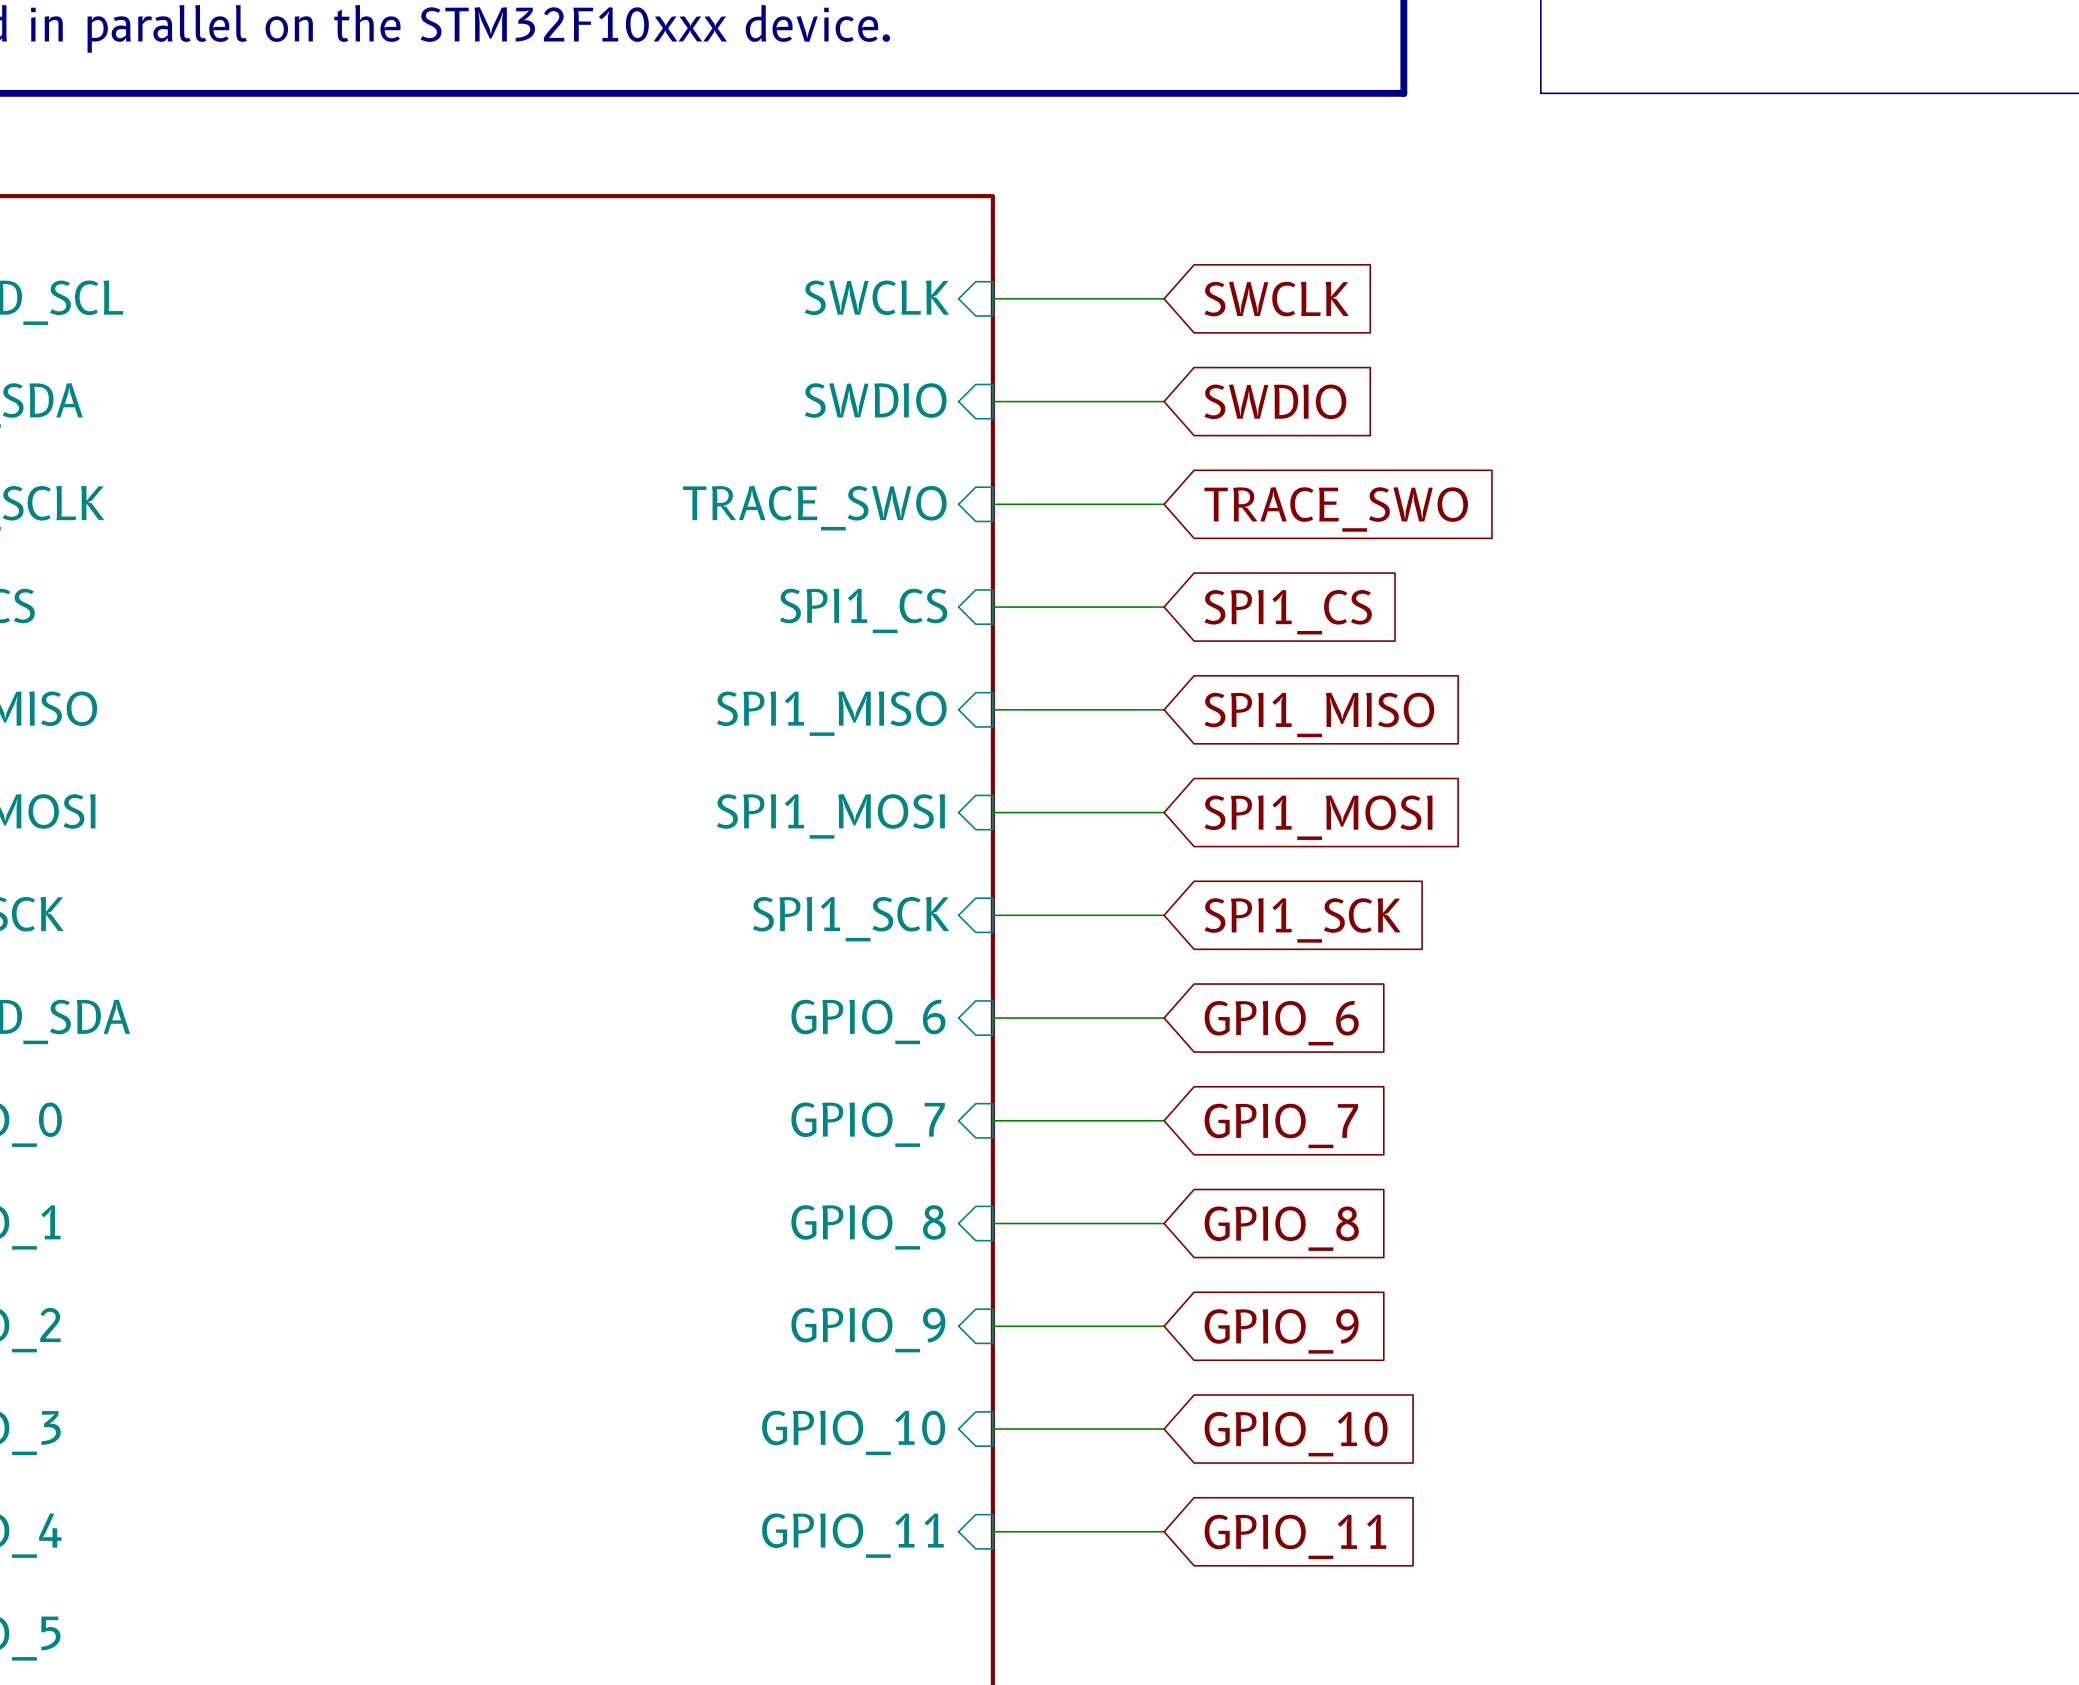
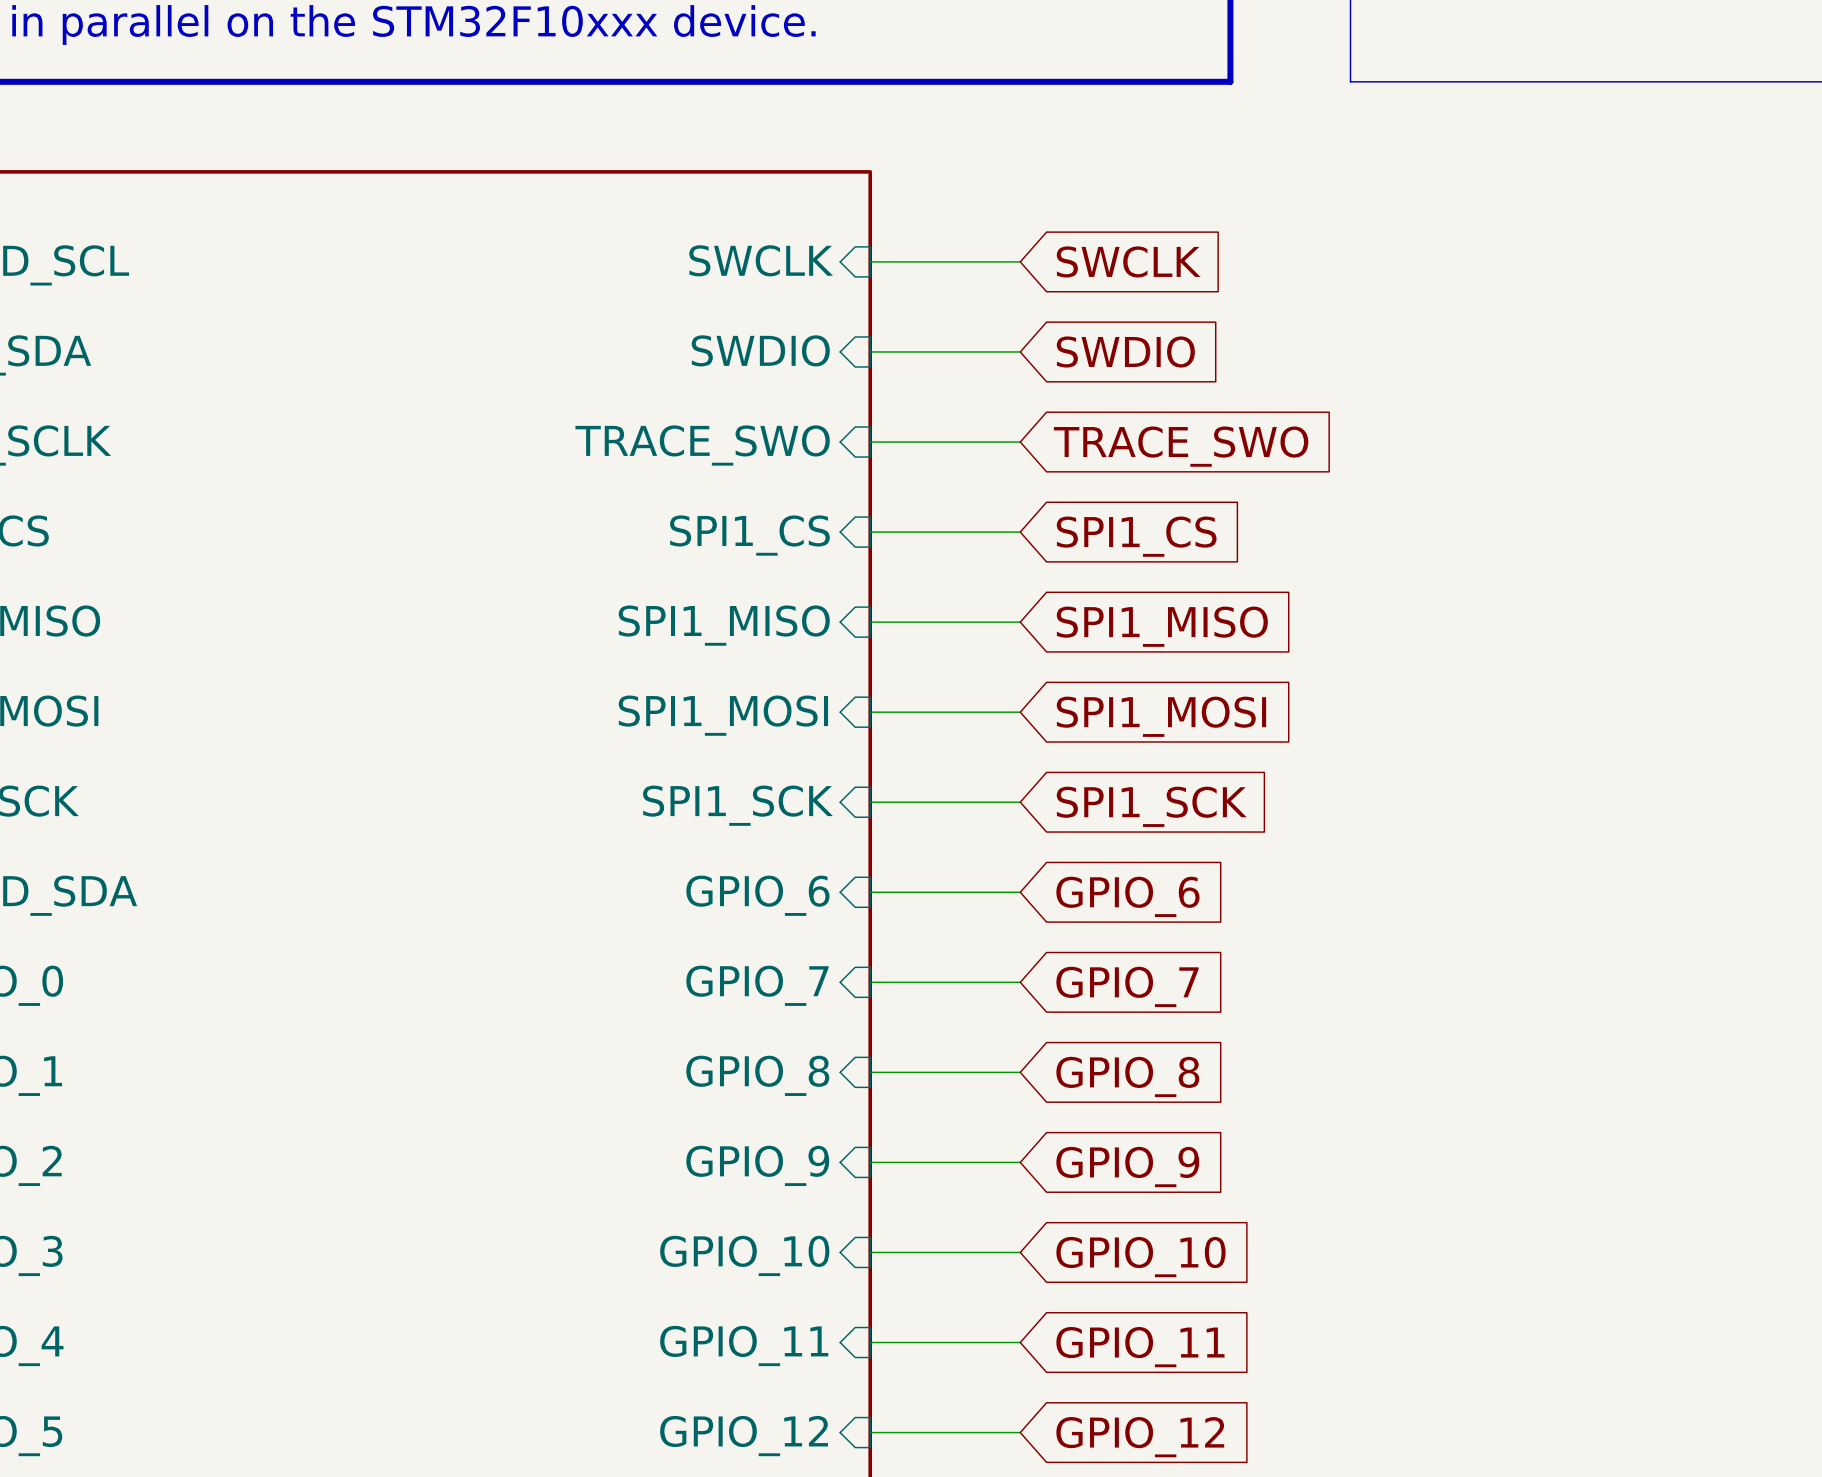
wire: none -> (870, 1432) (1020, 1432)
sheet pin: none -> GPIO_12 (744, 1436)
global label: none -> GPIO_12 (1140, 1437)

